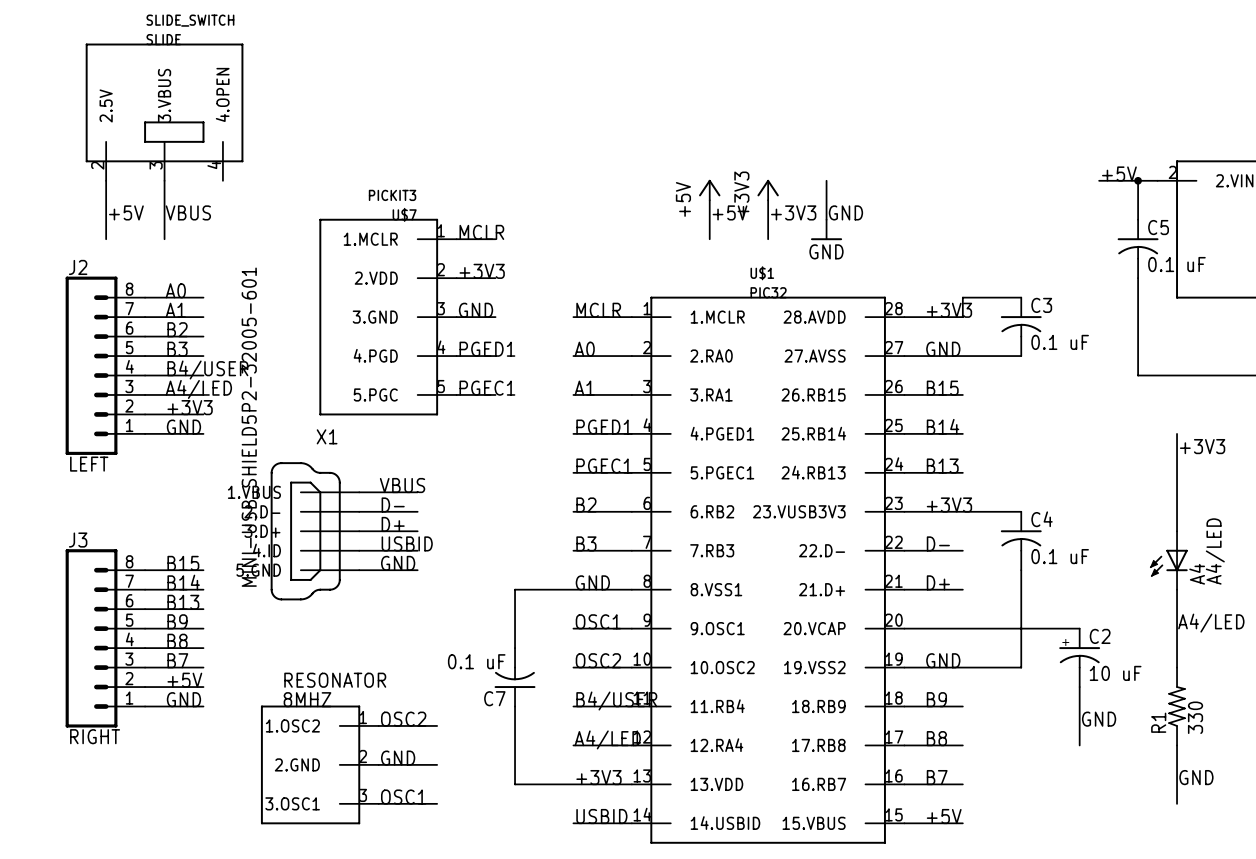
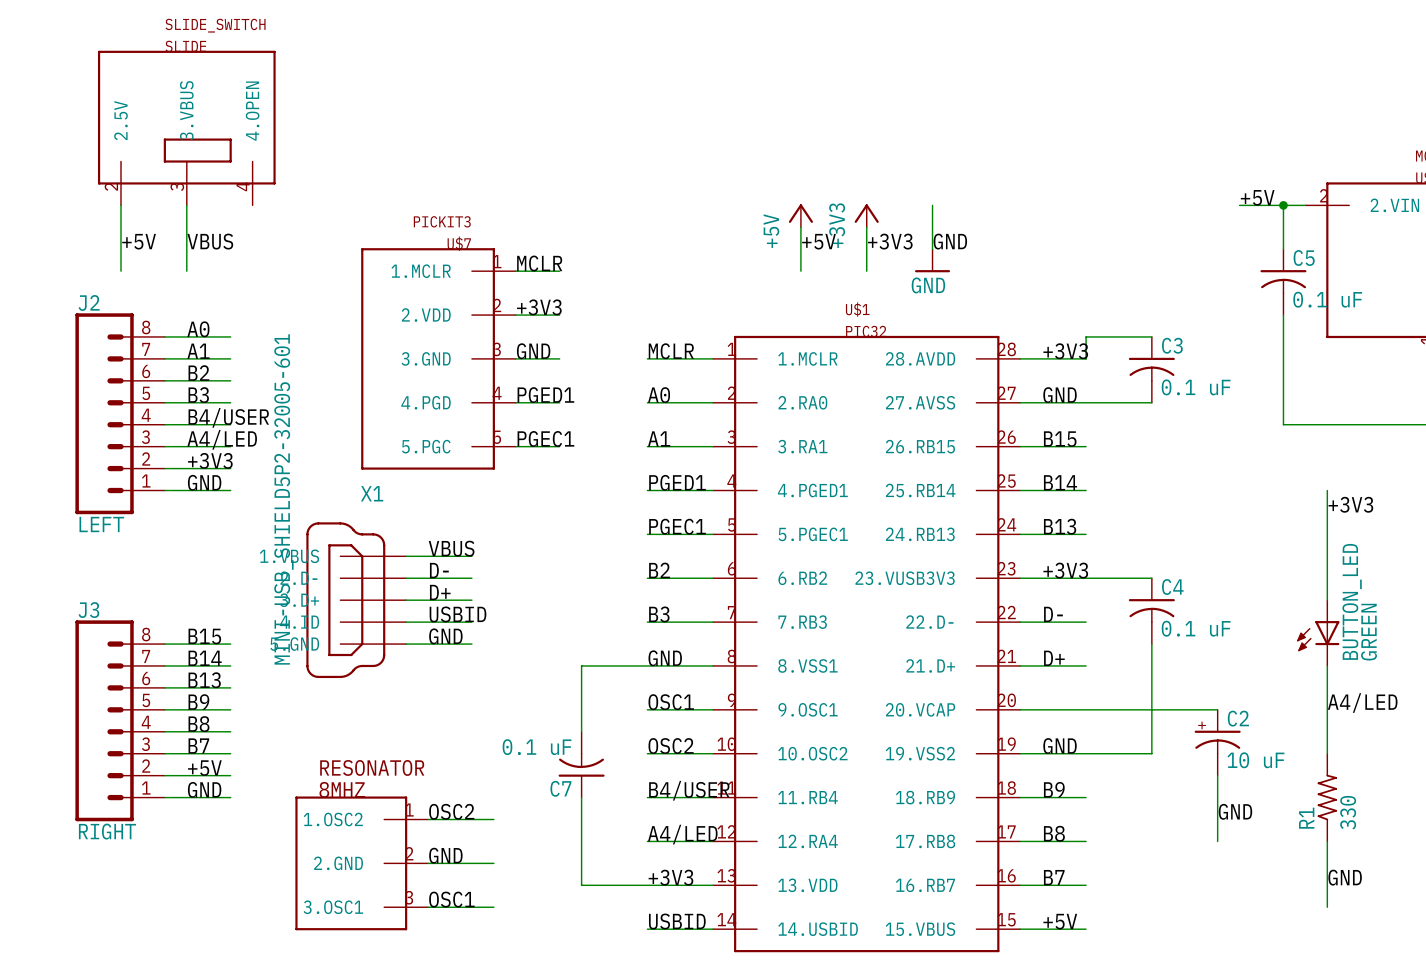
A4 value: A4/LED (1215, 551) -> GREEN (1369, 632)
A4 name: A4 (1197, 574) -> BUTTON_LED (1352, 601)

